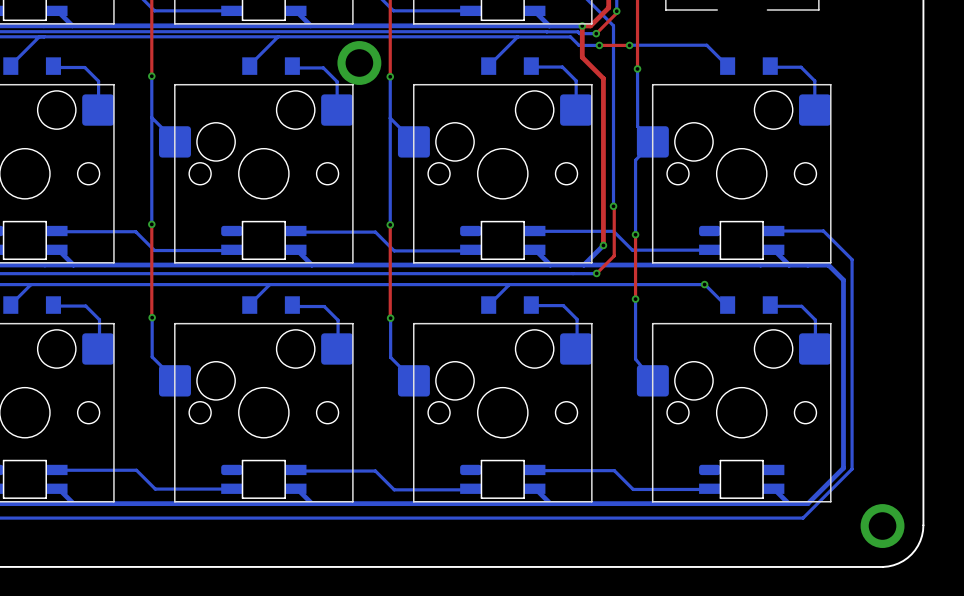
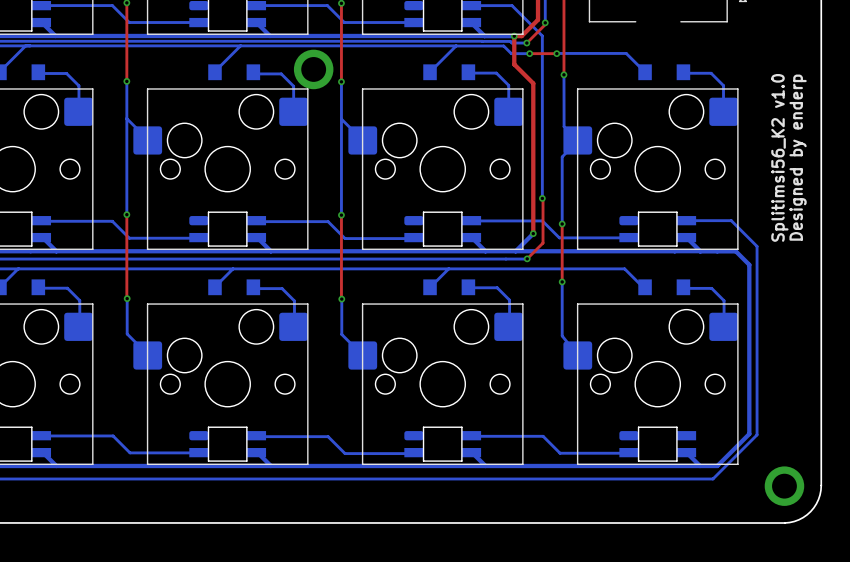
text: none -> Designed by enderp (798, 157)
text: none -> Splitimsi56_K2 v1.0 (779, 157)
via: (704, 284) -> none

